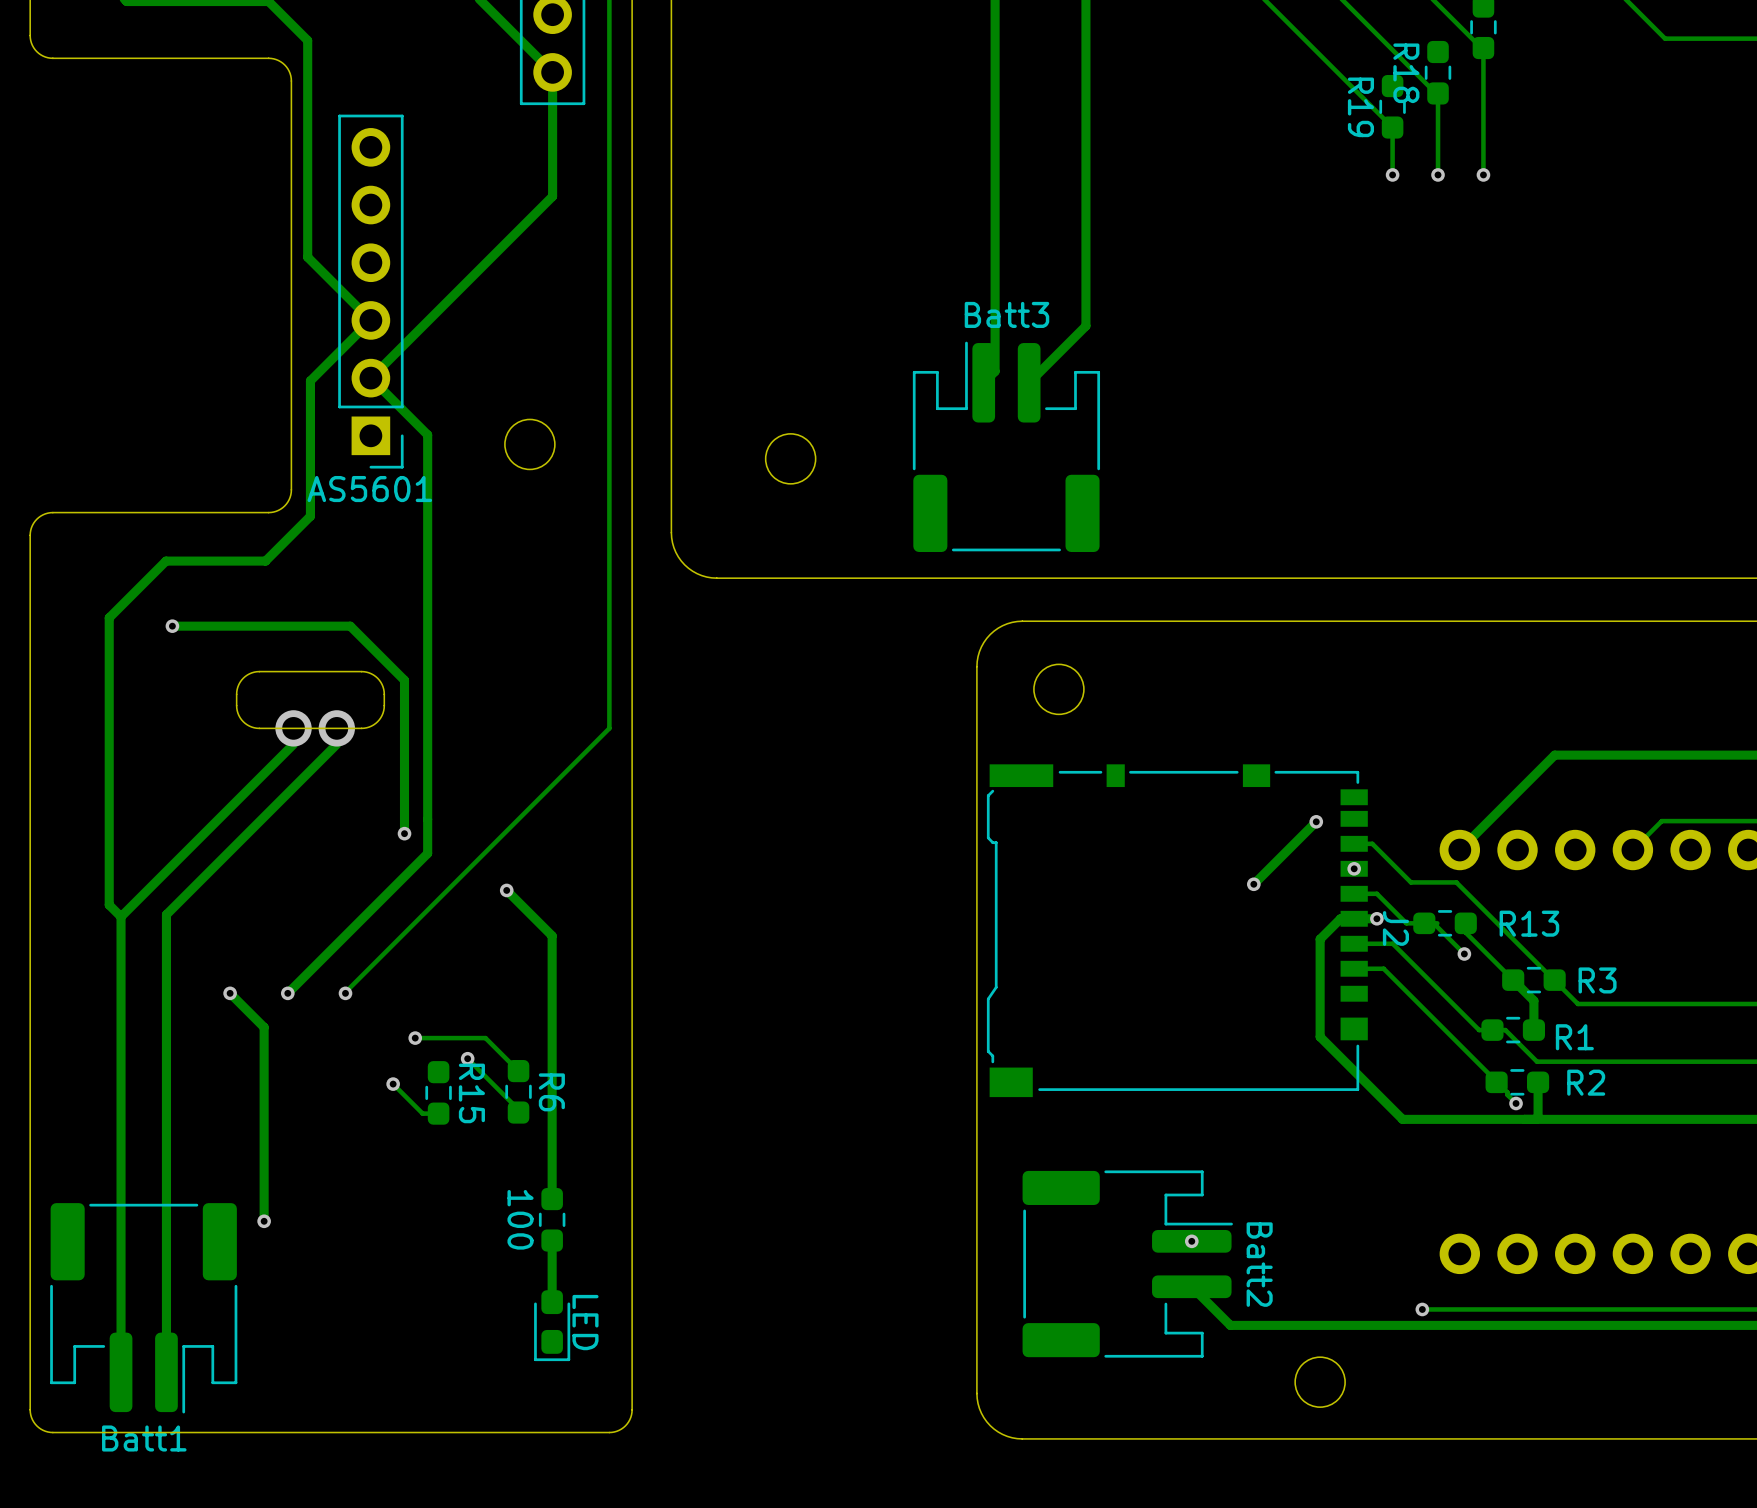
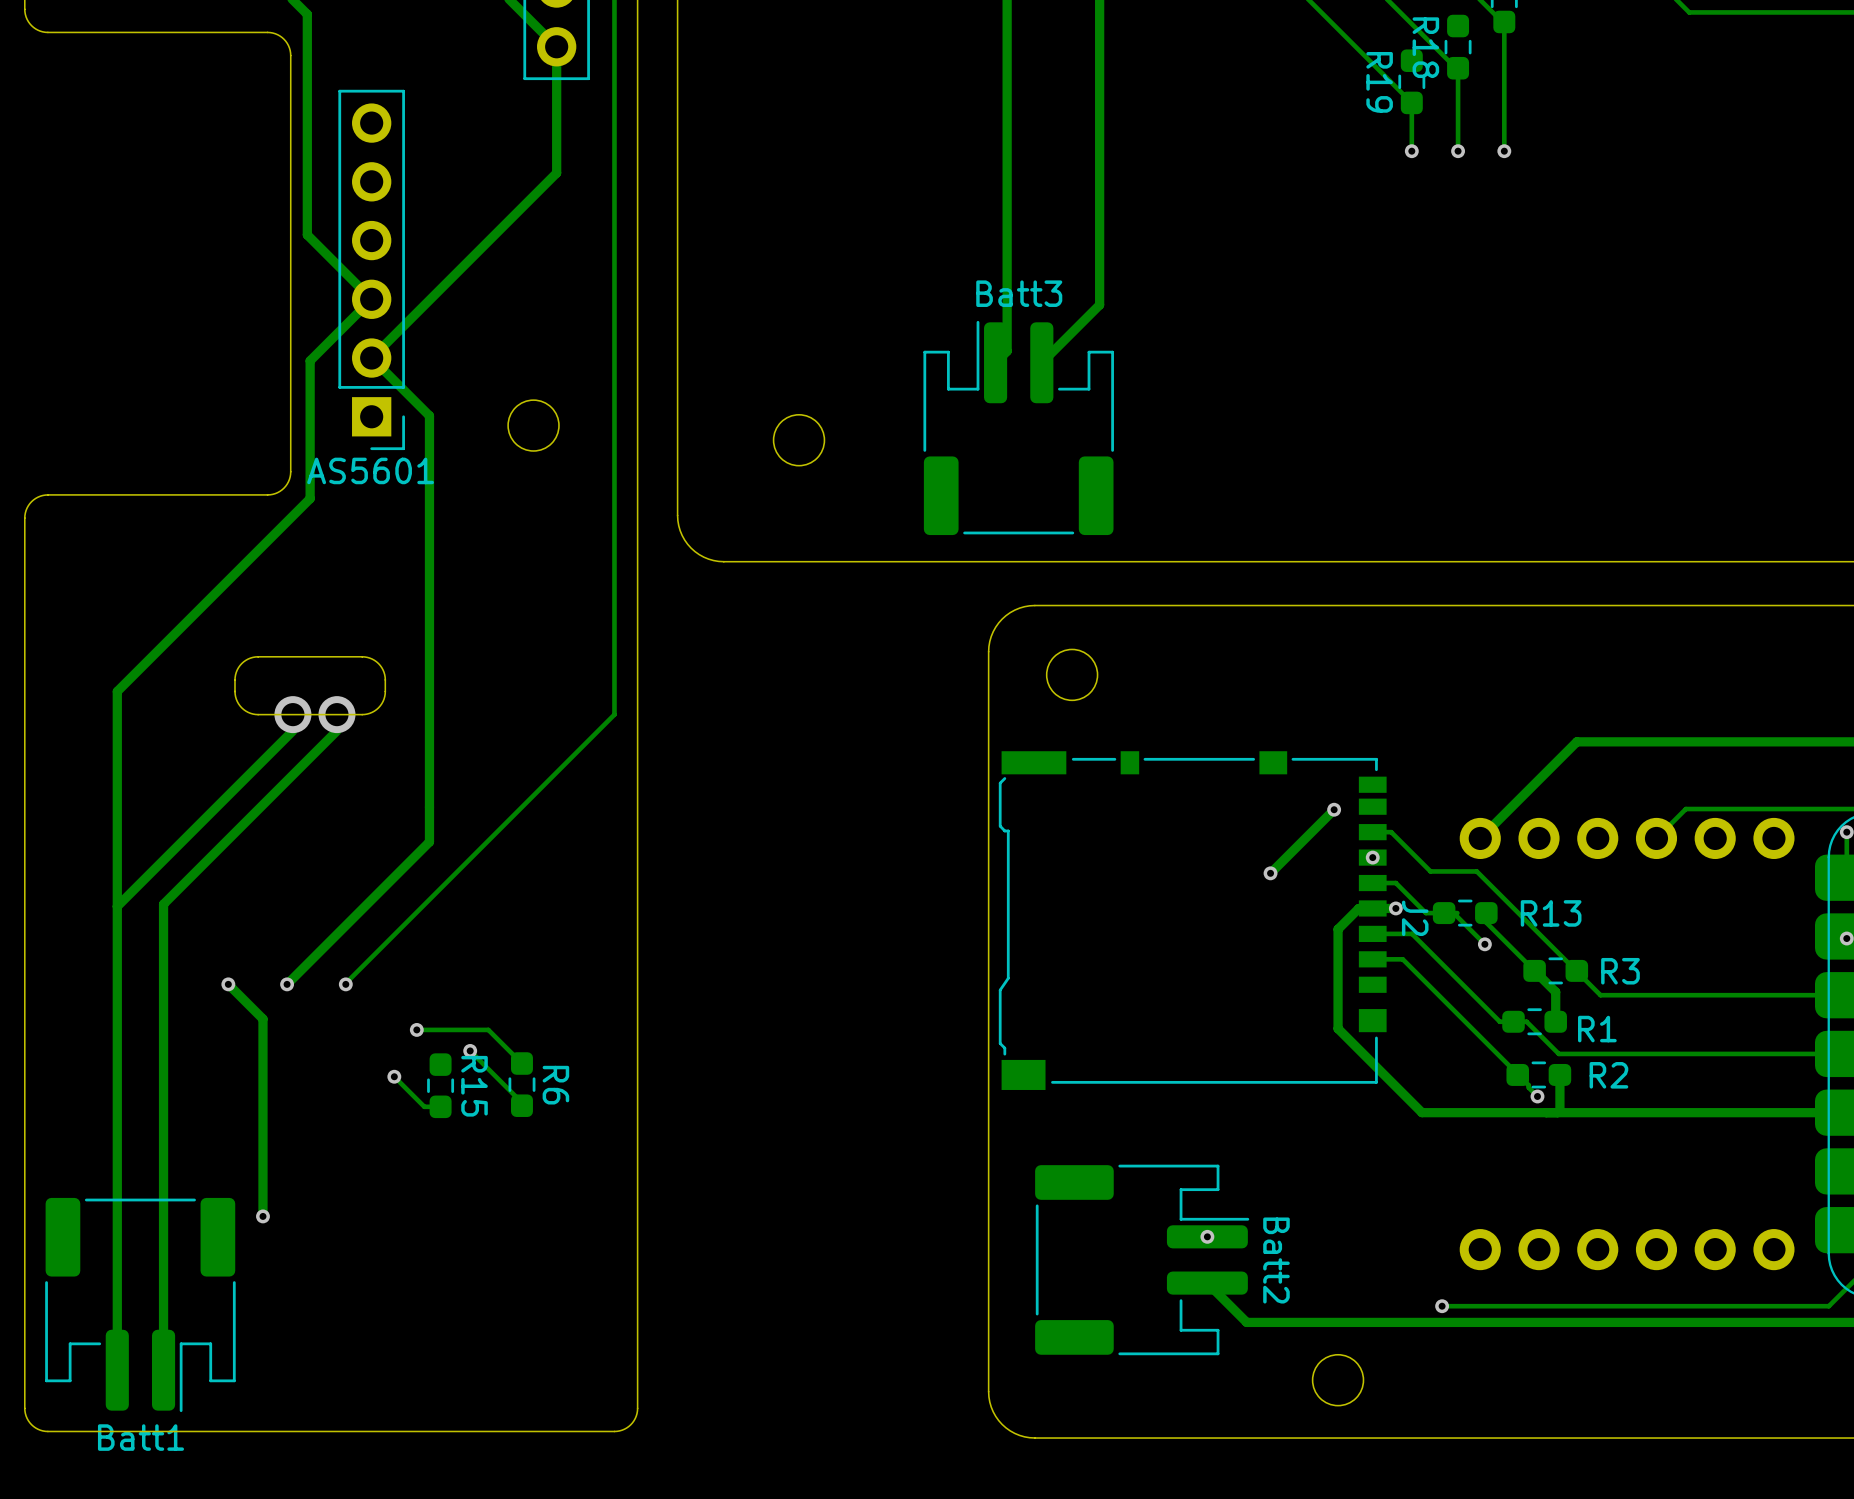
track: (265, 561) (166, 561) (109, 617) (109, 905) (121, 916) -> (264, 544) (117, 691) (117, 906)
track: (172, 626) (350, 626) (404, 680) (404, 833) -> none
via: (172, 626) -> none
via: (404, 833) -> none
track: (506, 890) (552, 935) (552, 1199) -> none
via: (506, 890) -> none
part: 100 (552, 1219) -> none
track: (552, 1240) (552, 1302) -> none
part: LED (552, 1325) -> none

